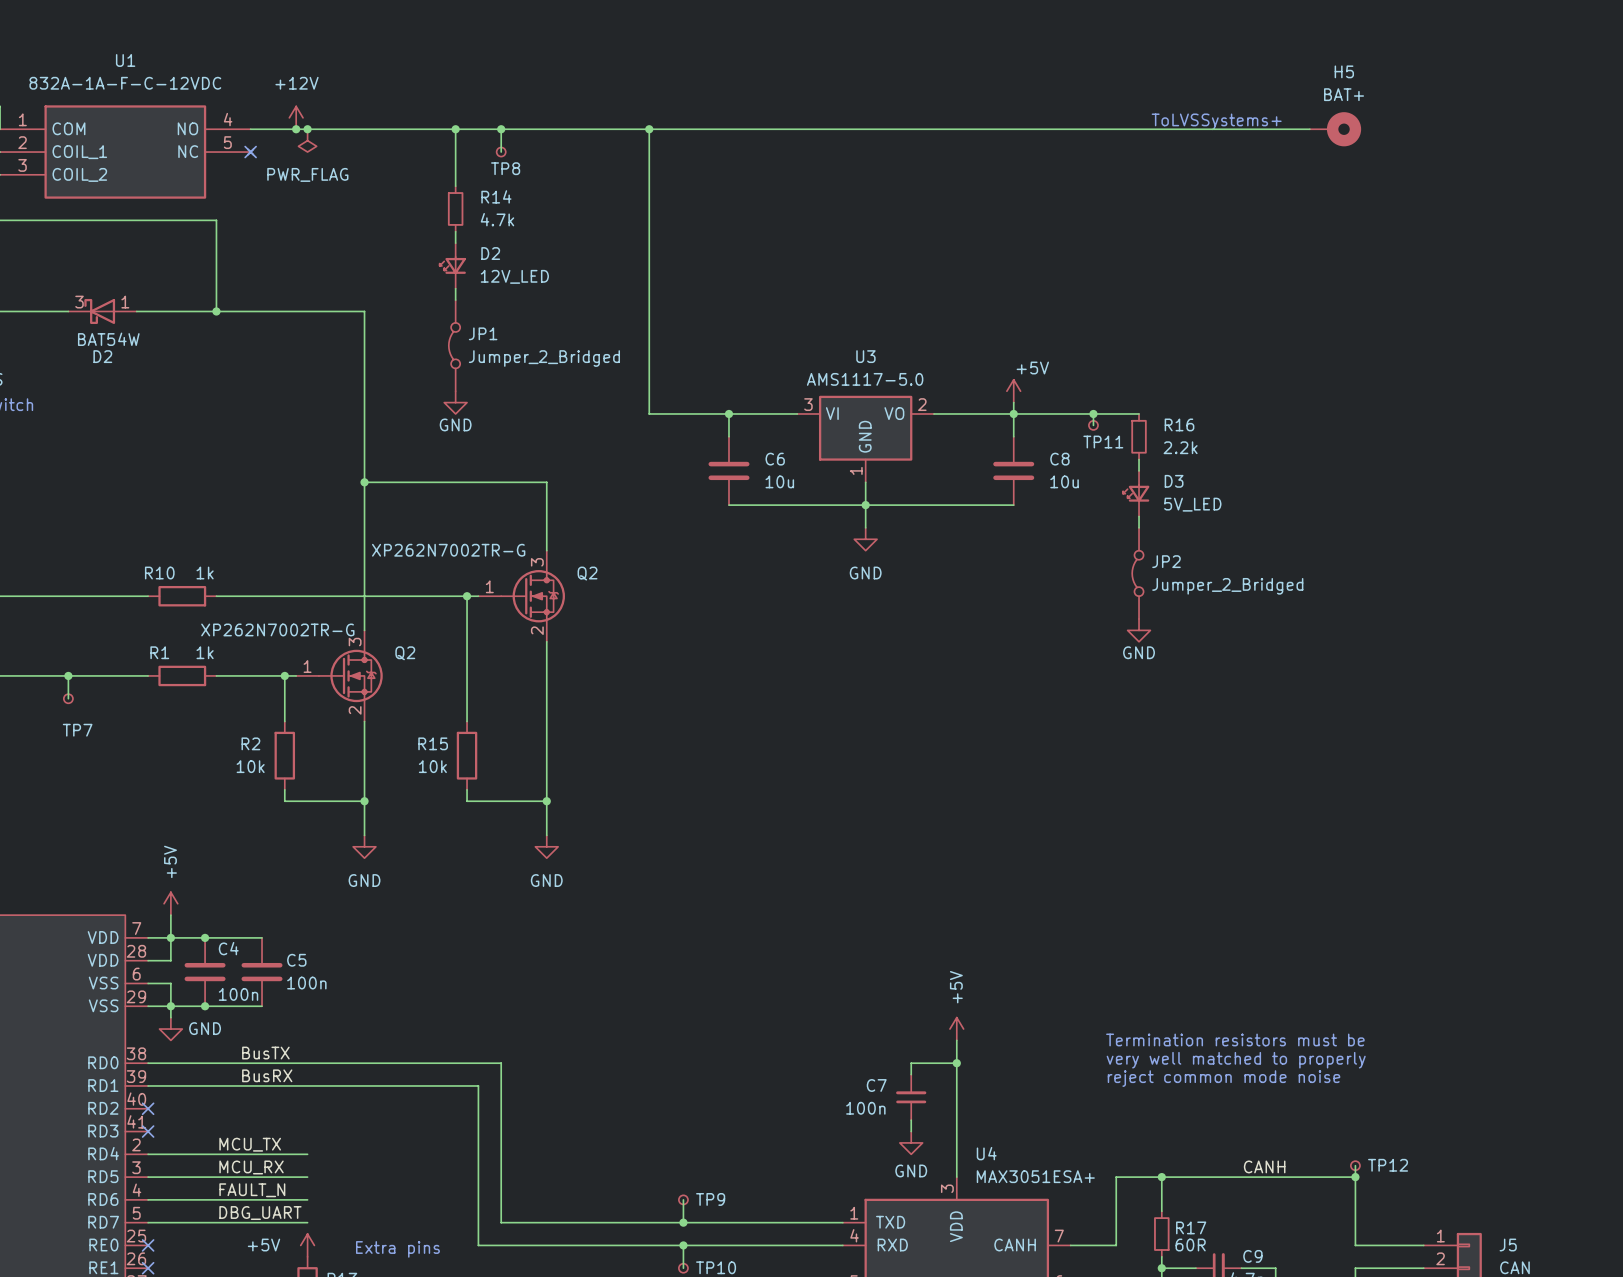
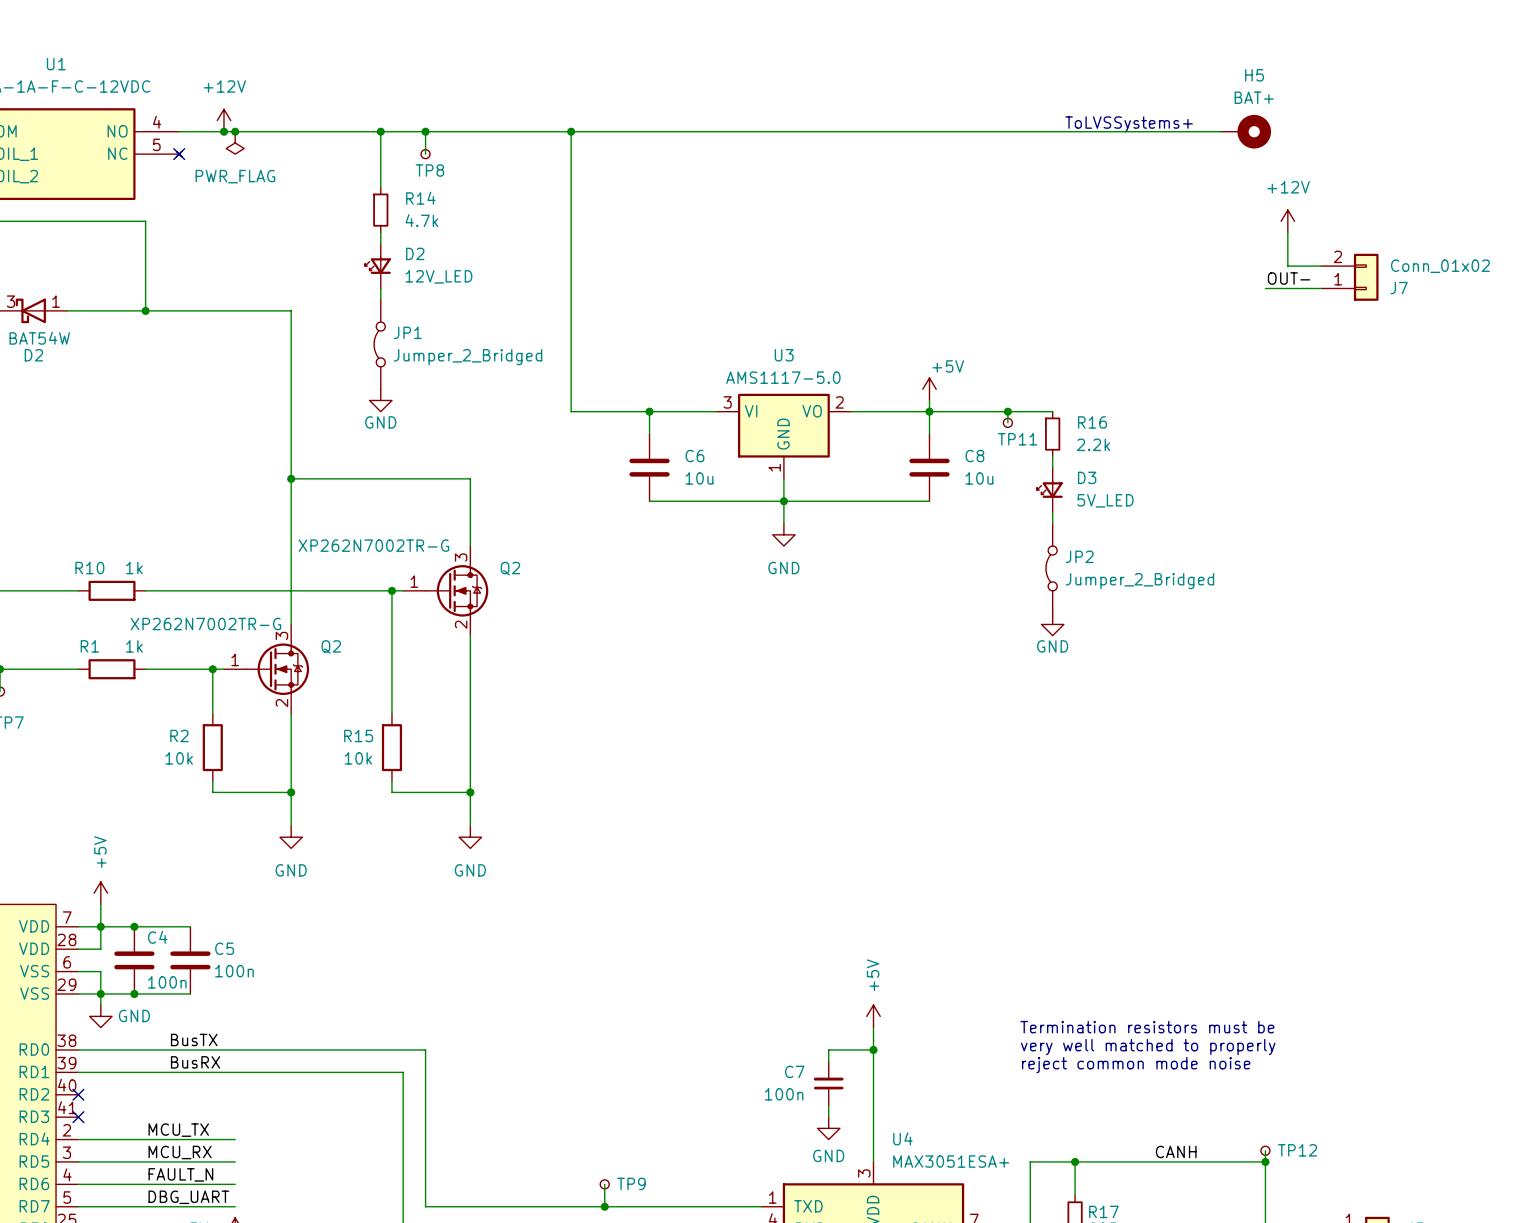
power symbol: none -> +12V (1287, 221)
wire: none -> (1287, 232) (1287, 266) (1321, 266)
J7: none -> Conn_01x02 (1349, 277)
label: none -> OUT- (1288, 278)
wire: none -> (1265, 288) (1321, 288)

